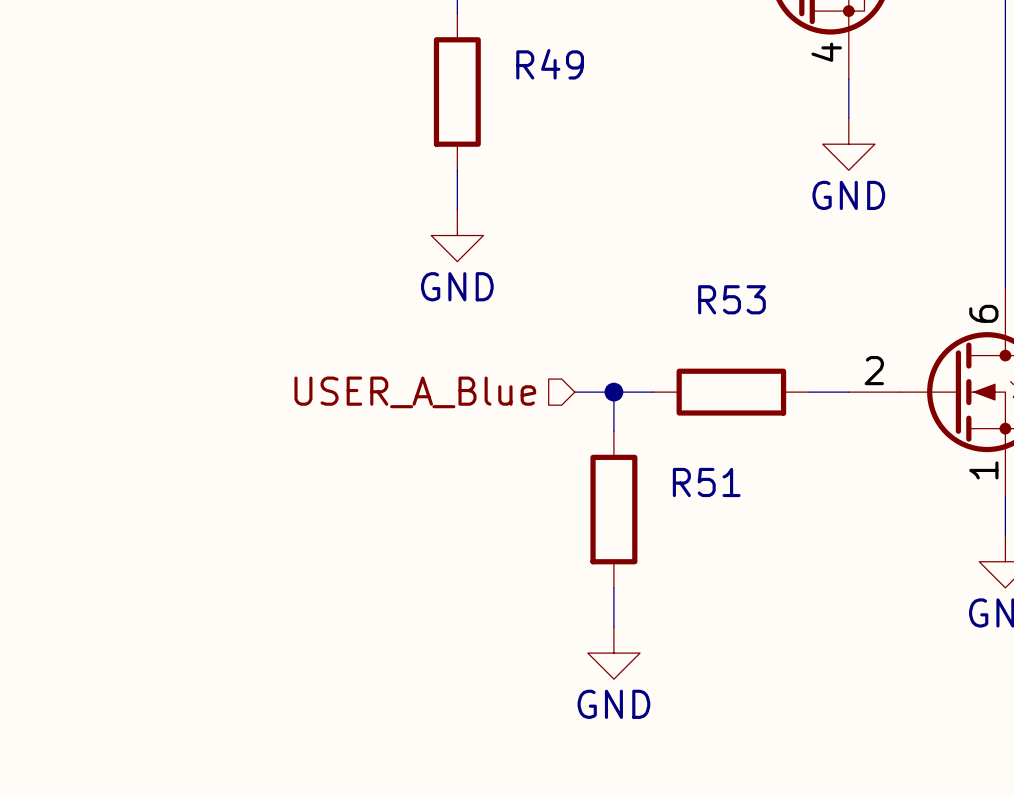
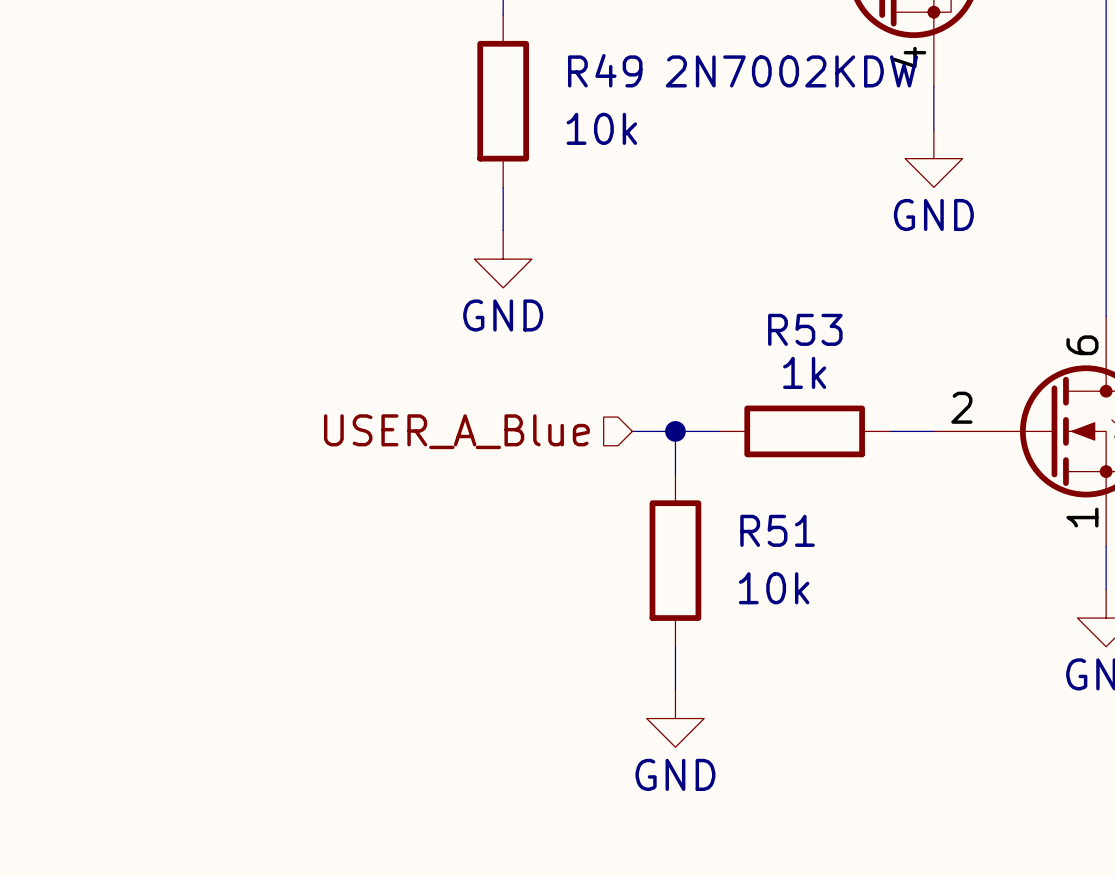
part value: none -> 2N7002KDW (791, 71)
R49 value: none -> 10k (601, 128)
R53 value: none -> 1k (804, 372)
R51 value: none -> 10k (774, 588)

